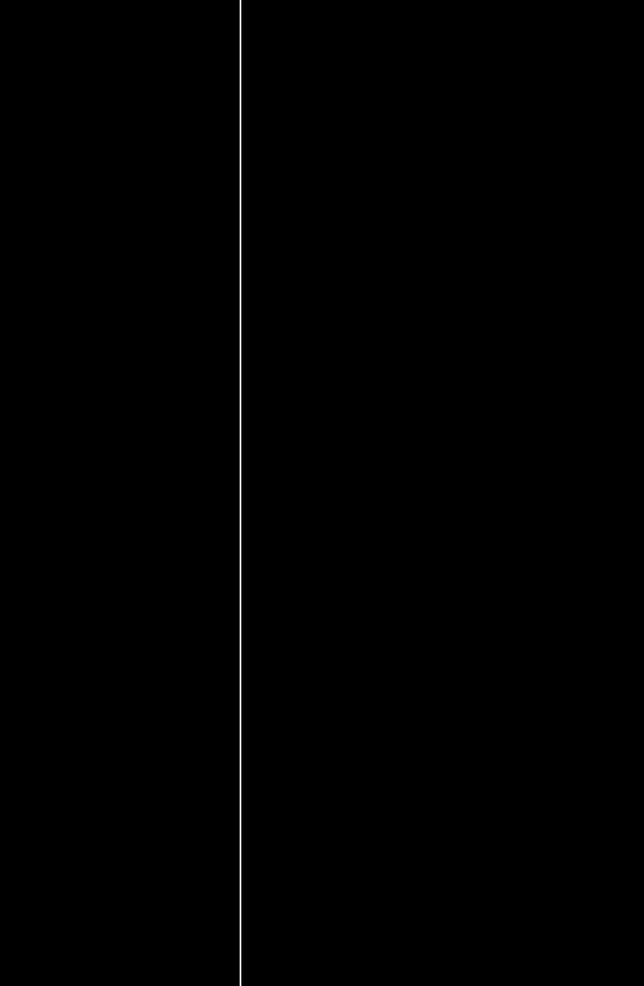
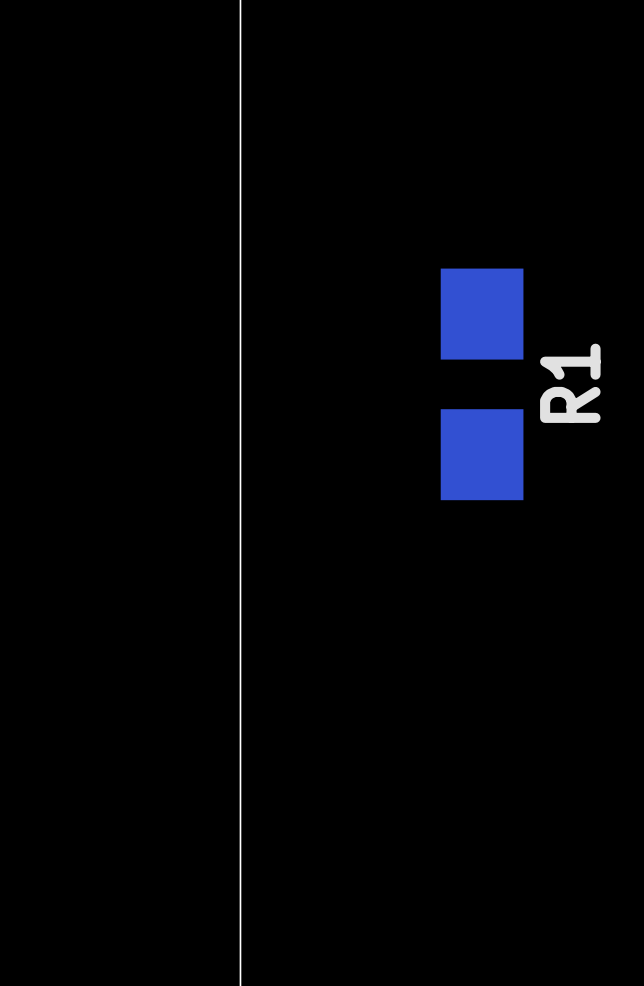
R1: none -> (482, 384)

